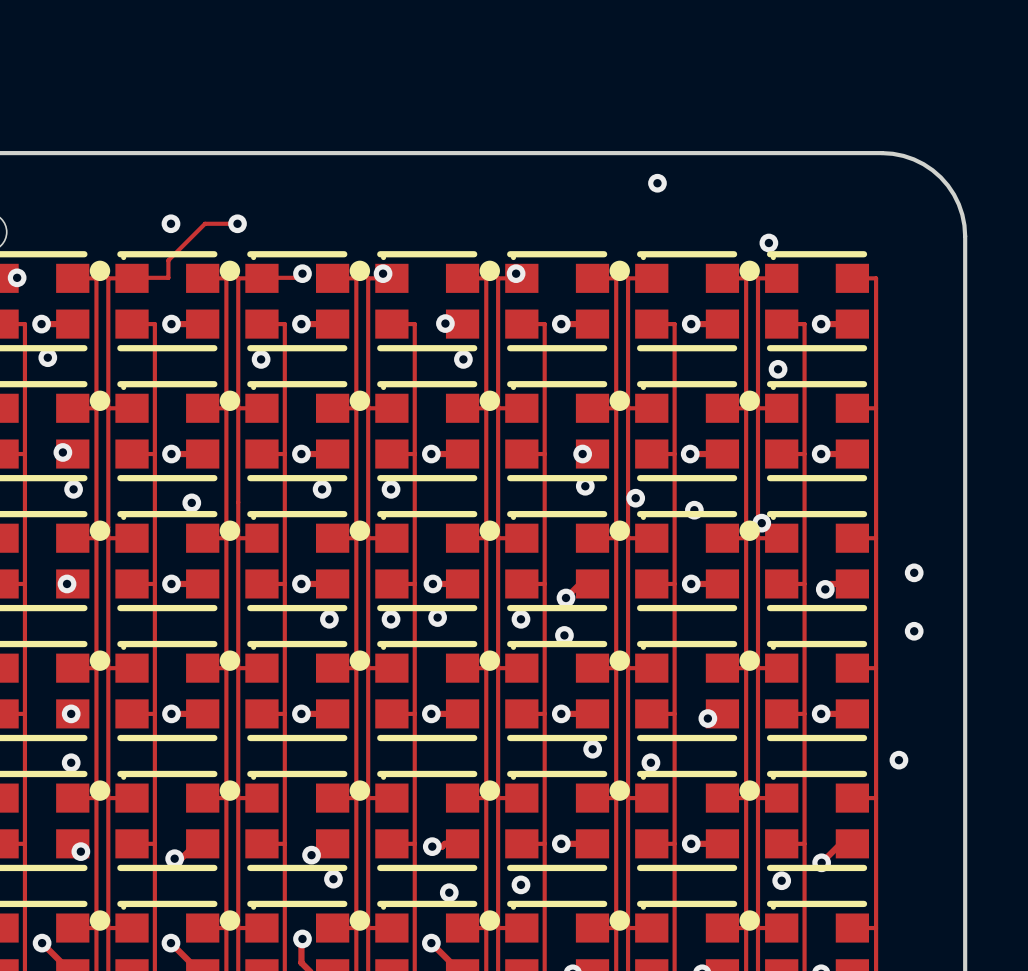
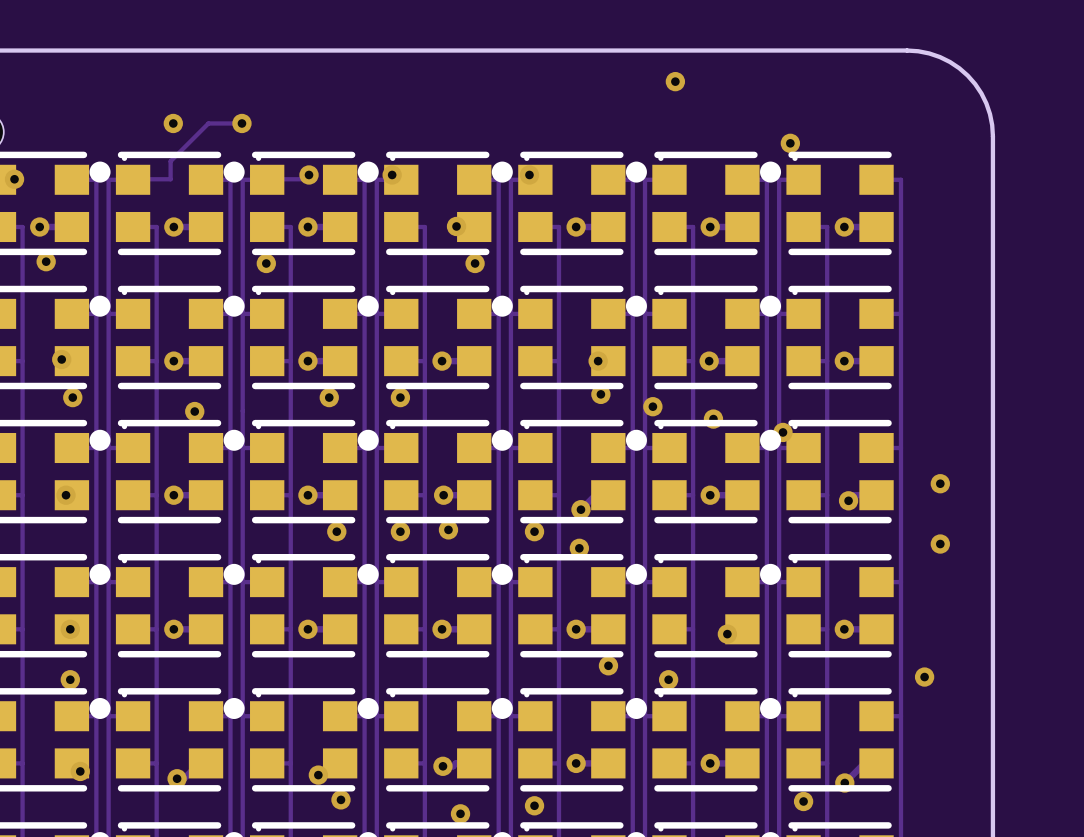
via: (778, 369) -> none

